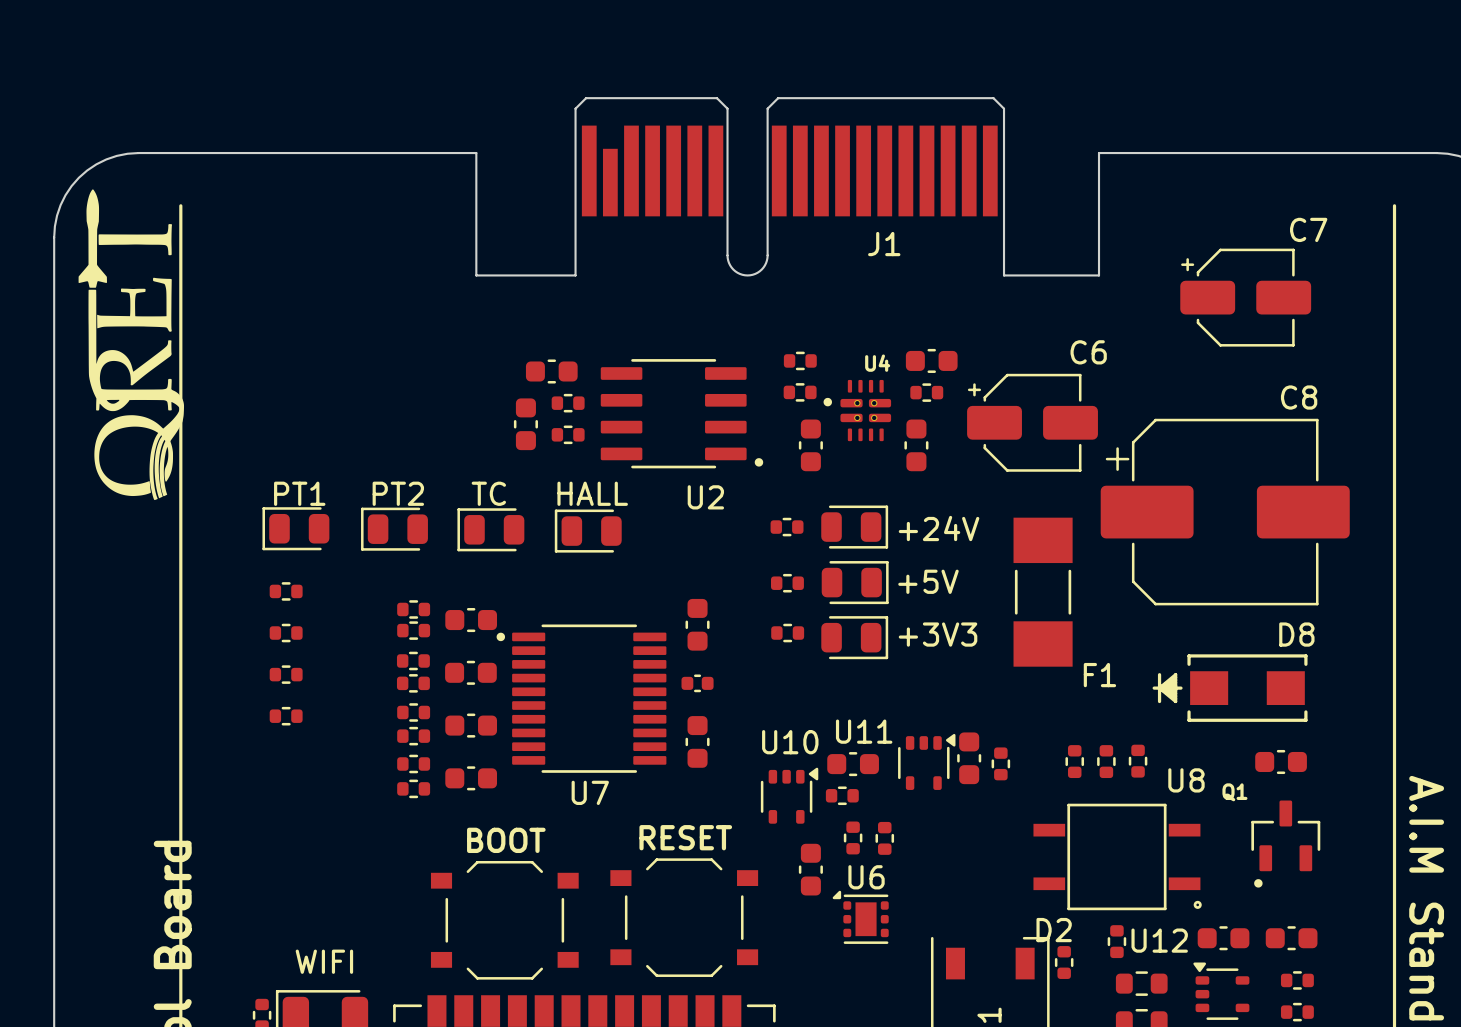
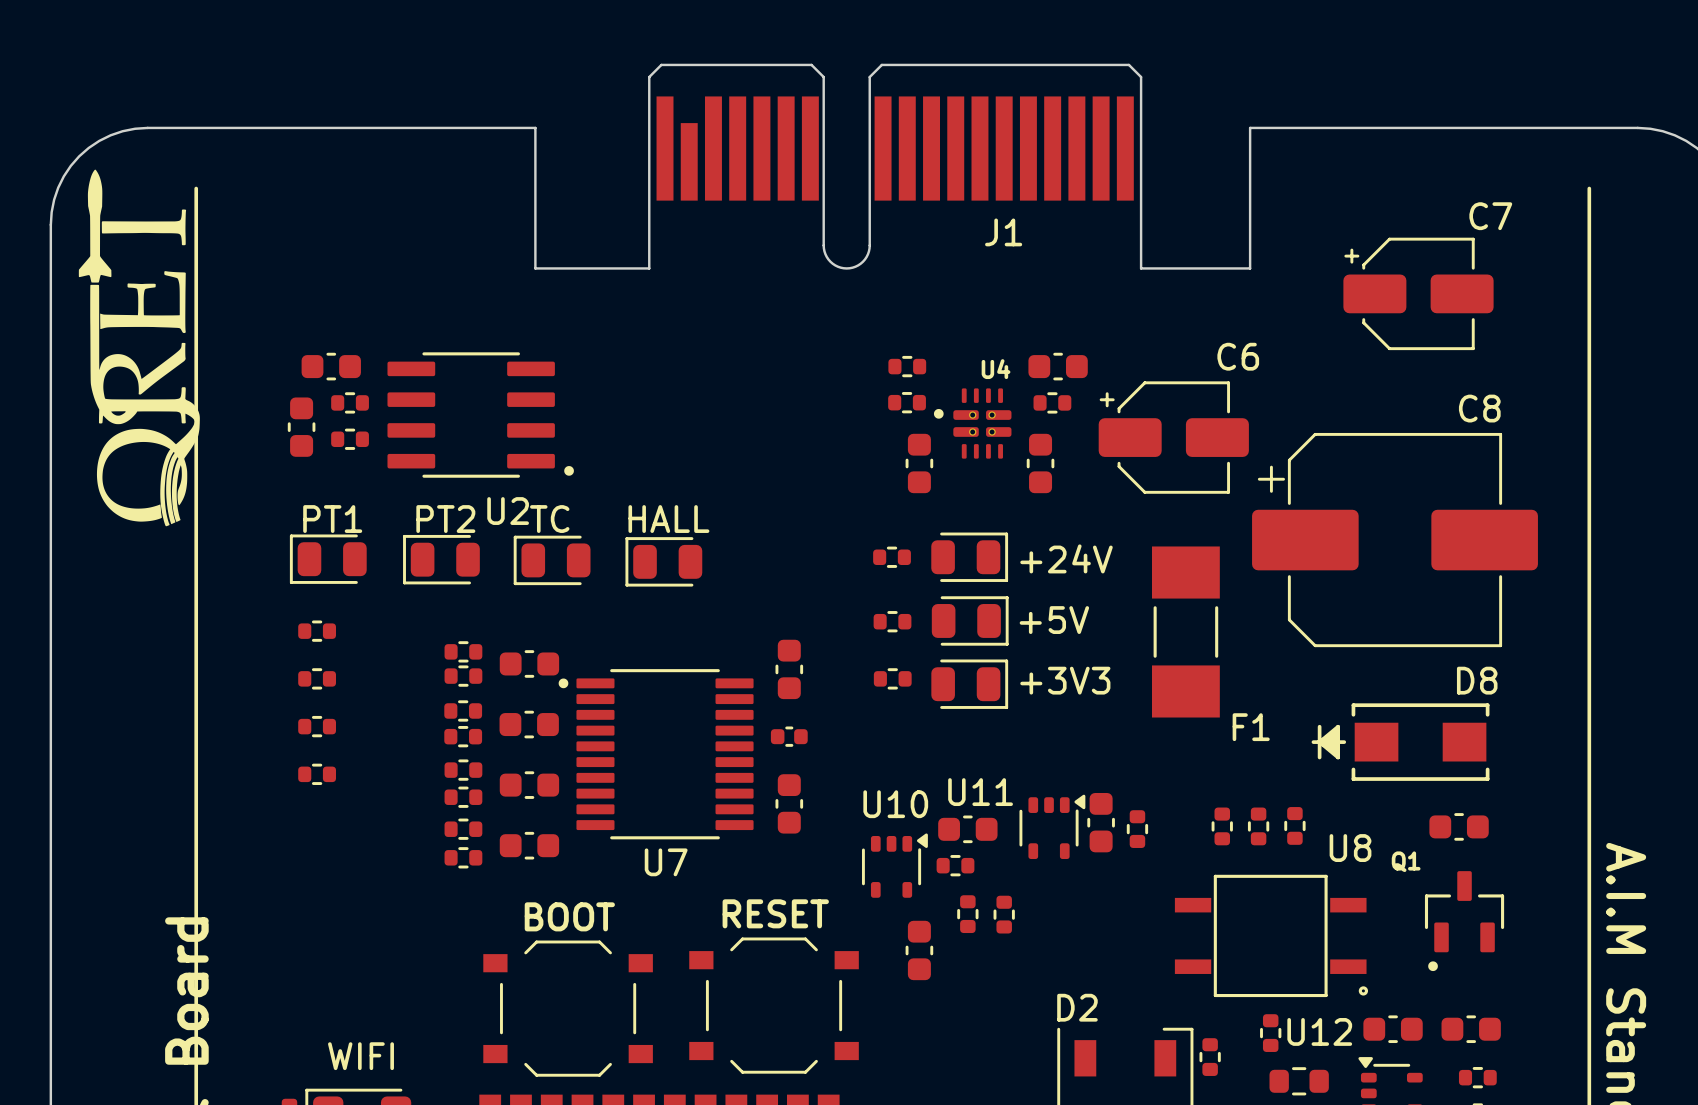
part: none -> (331, 366)
part: (551, 371) -> none
part: none -> (350, 402)
part: (568, 403) -> none
part: none -> (301, 427)
U2 position: (681, 413) -> (480, 415)
part: none -> (350, 439)
part: (525, 424) -> none
part: (568, 434) -> none
U6: (860, 917) -> none
D2 name position: D2 (1054, 930) -> D2 (1077, 1007)

